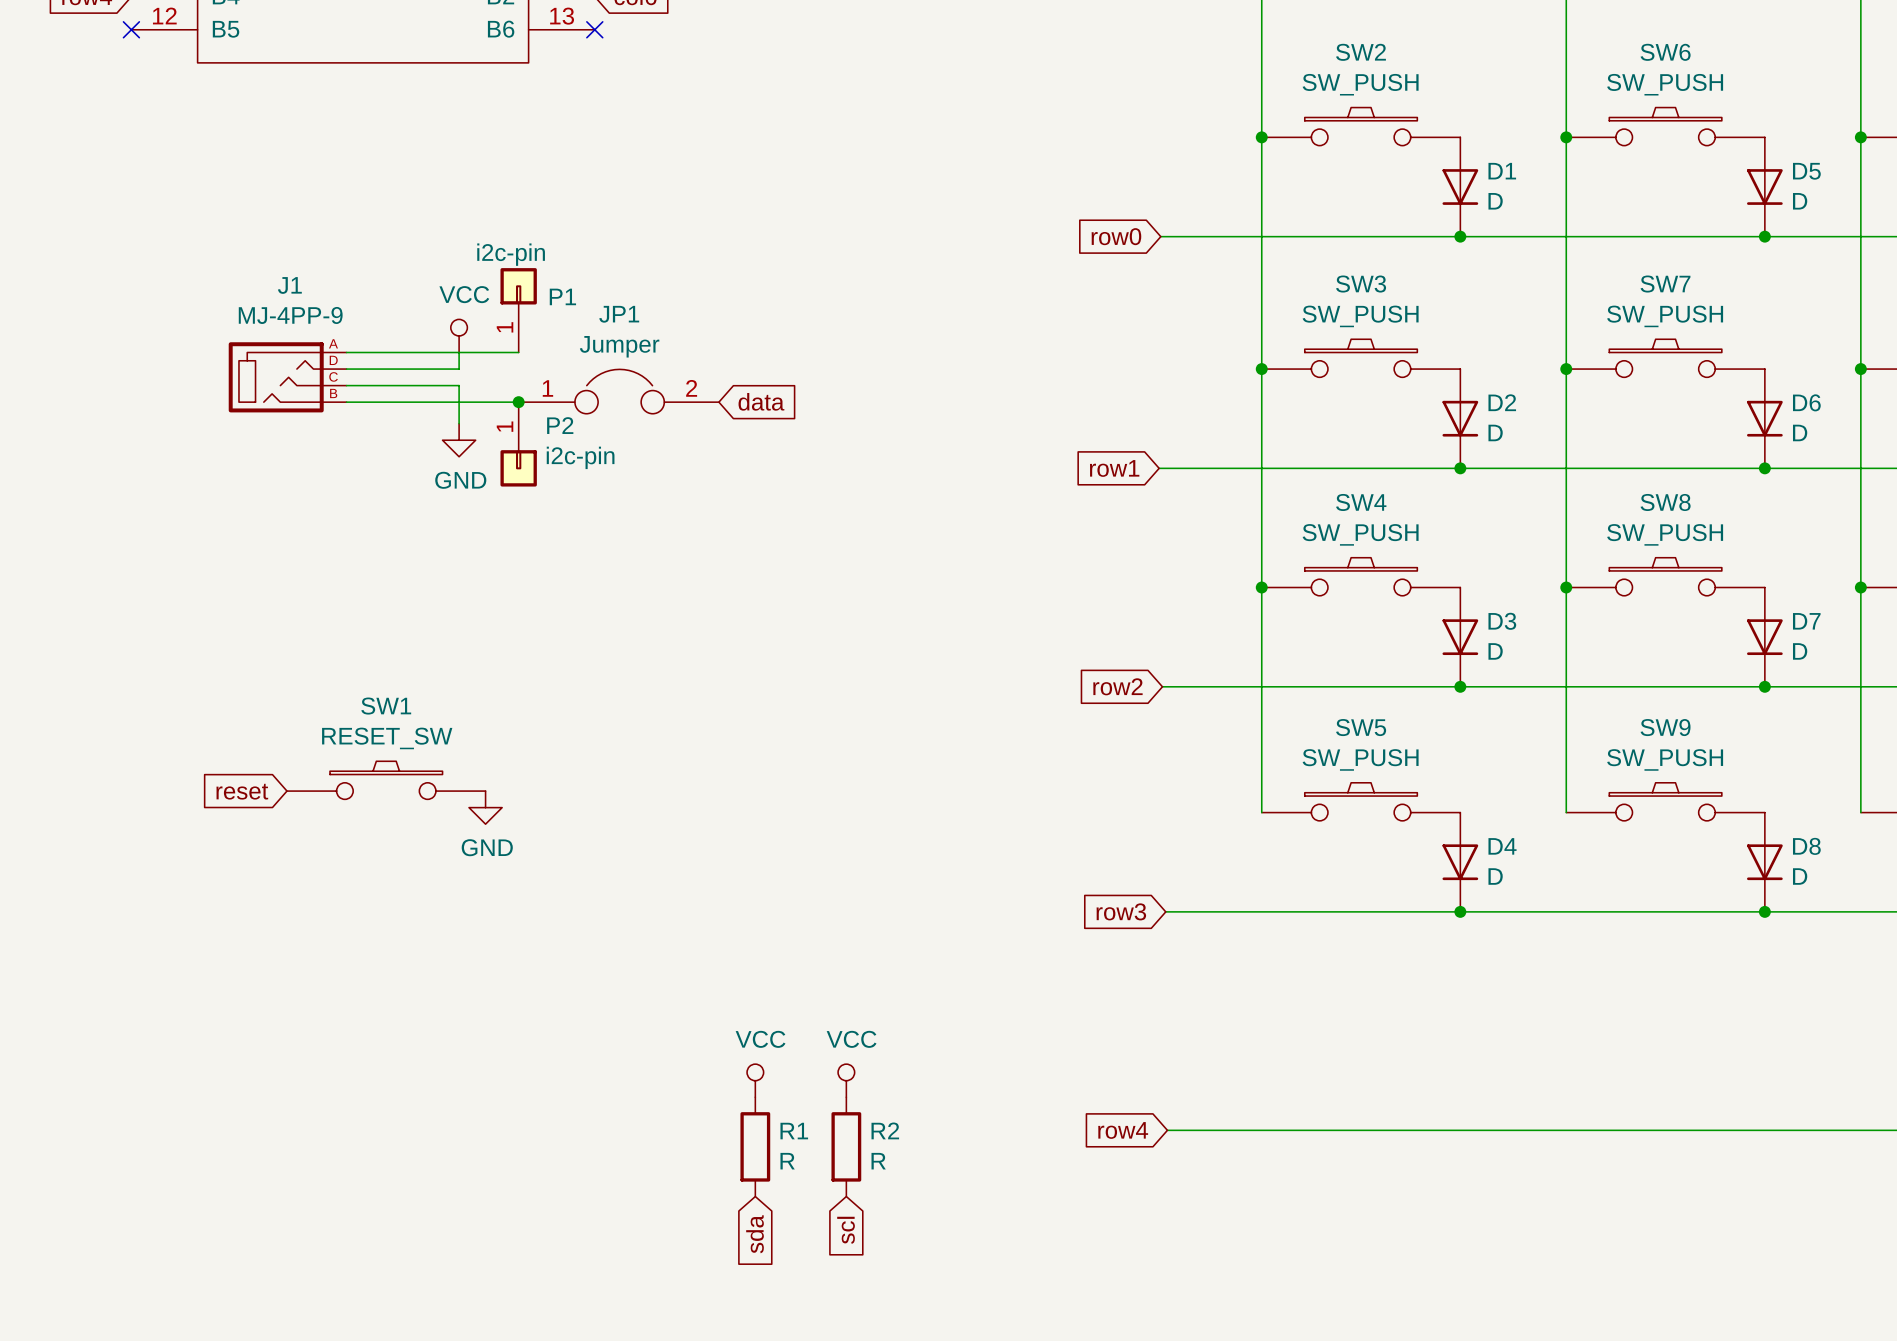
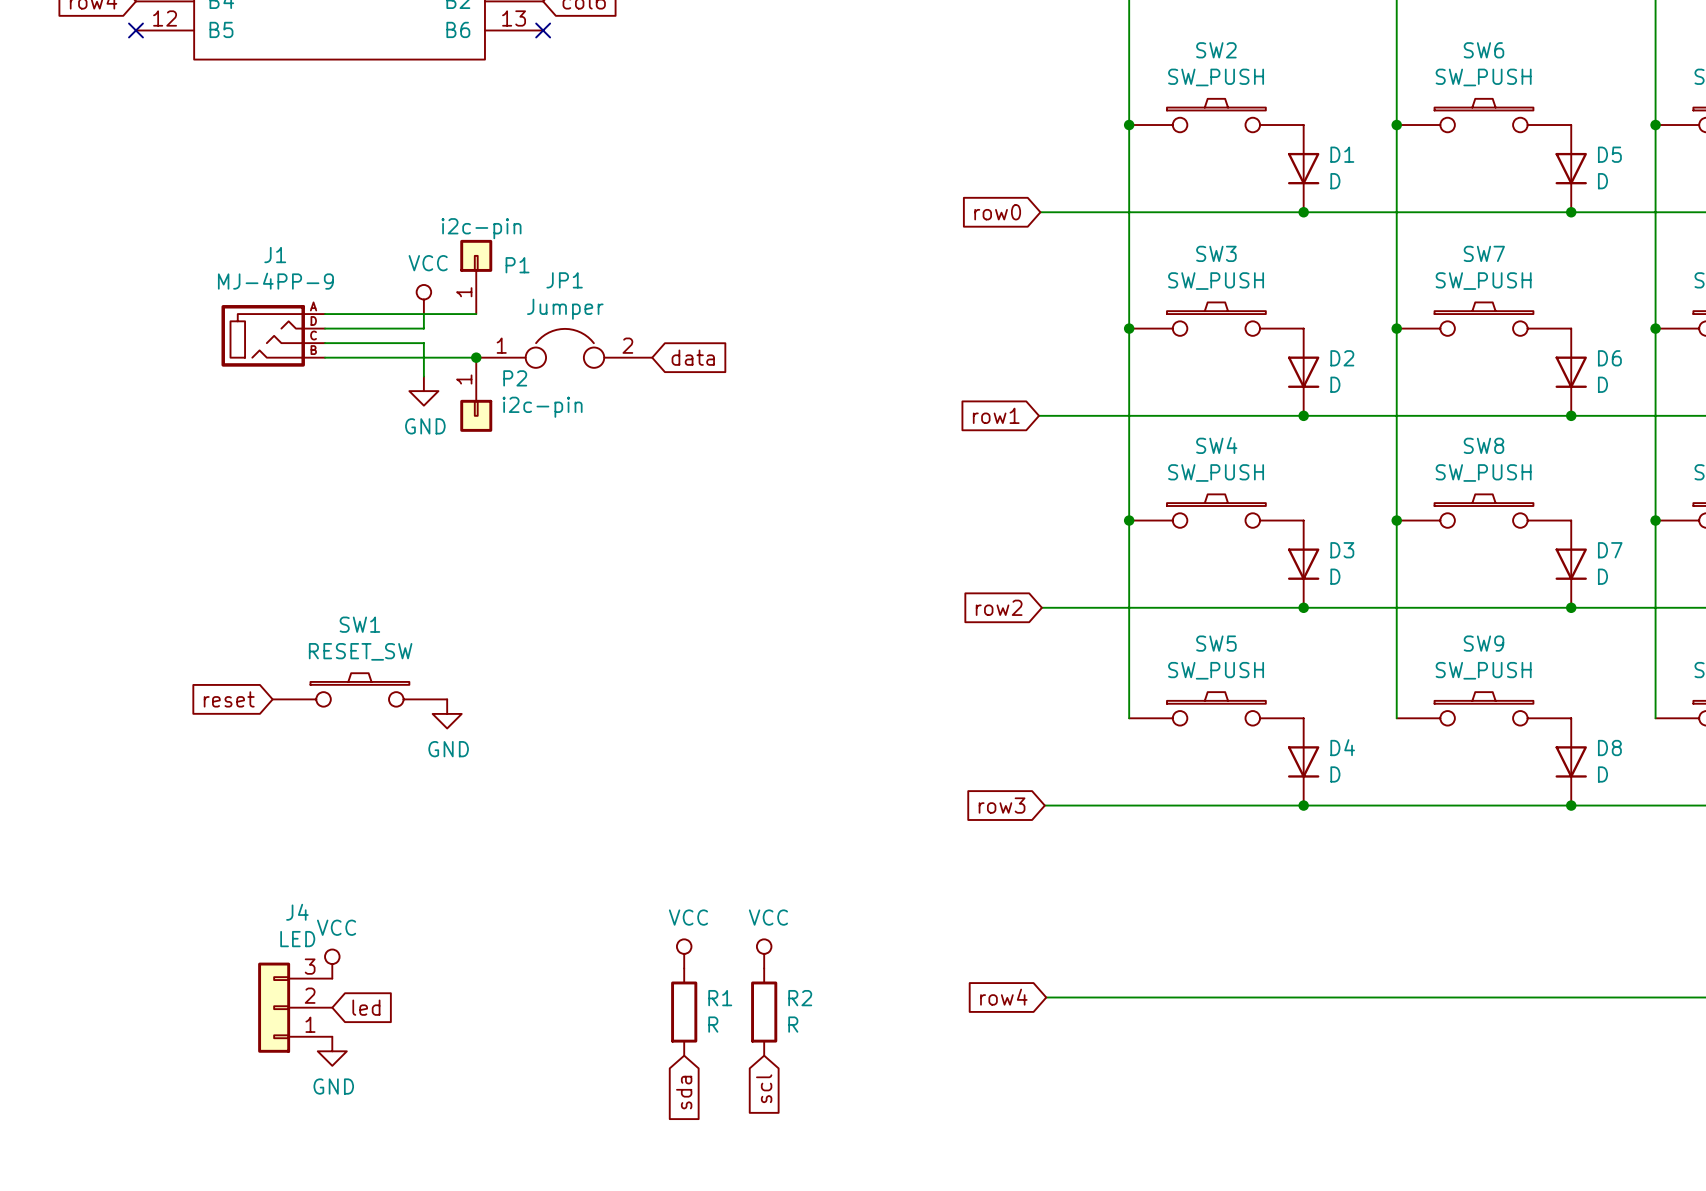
power symbol: none -> VCC (332, 964)
J4: none -> LED (295, 1007)
global label: none -> led (366, 1007)
power symbol: none -> GND (332, 1051)

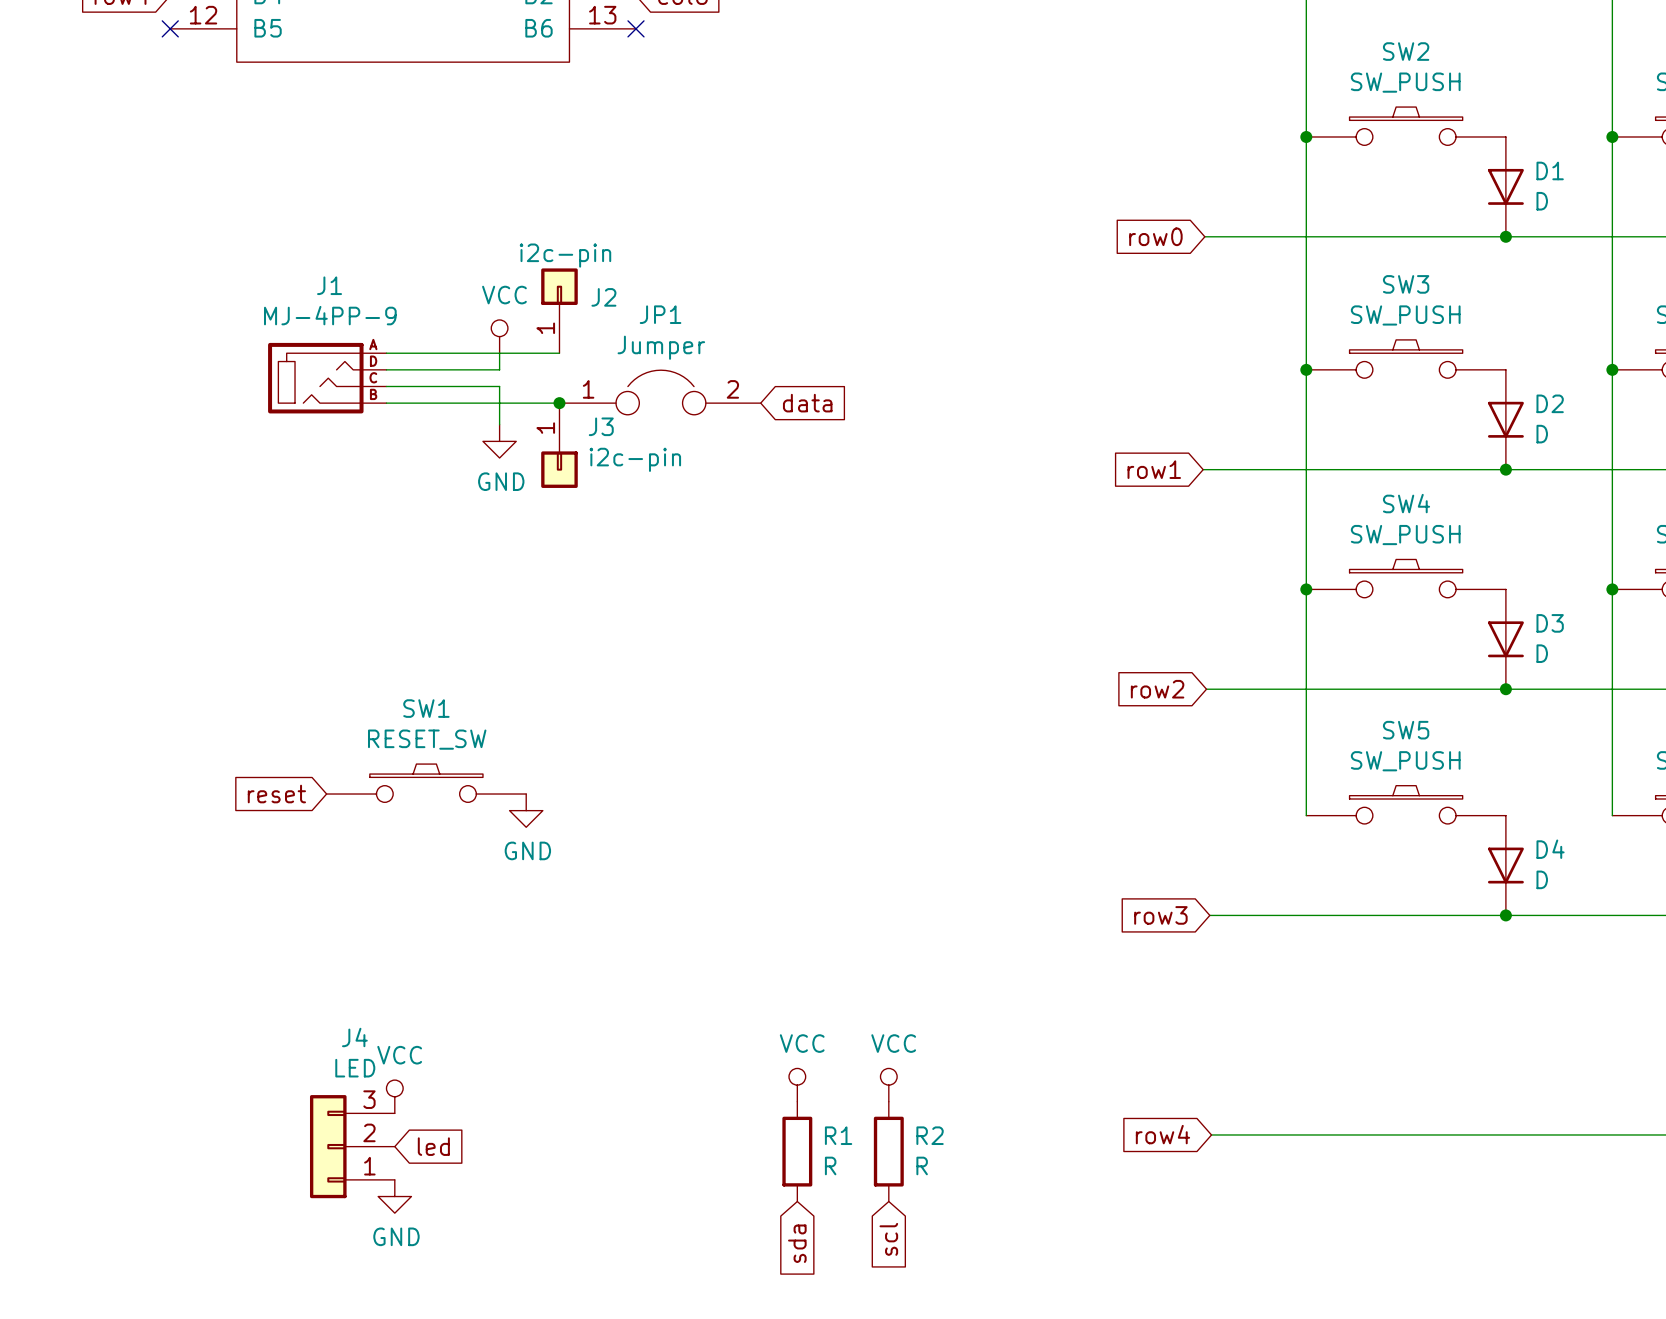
P1 name: P1 (517, 265) -> J2 (603, 297)
P2 name: P2 (515, 378) -> J3 (601, 426)

